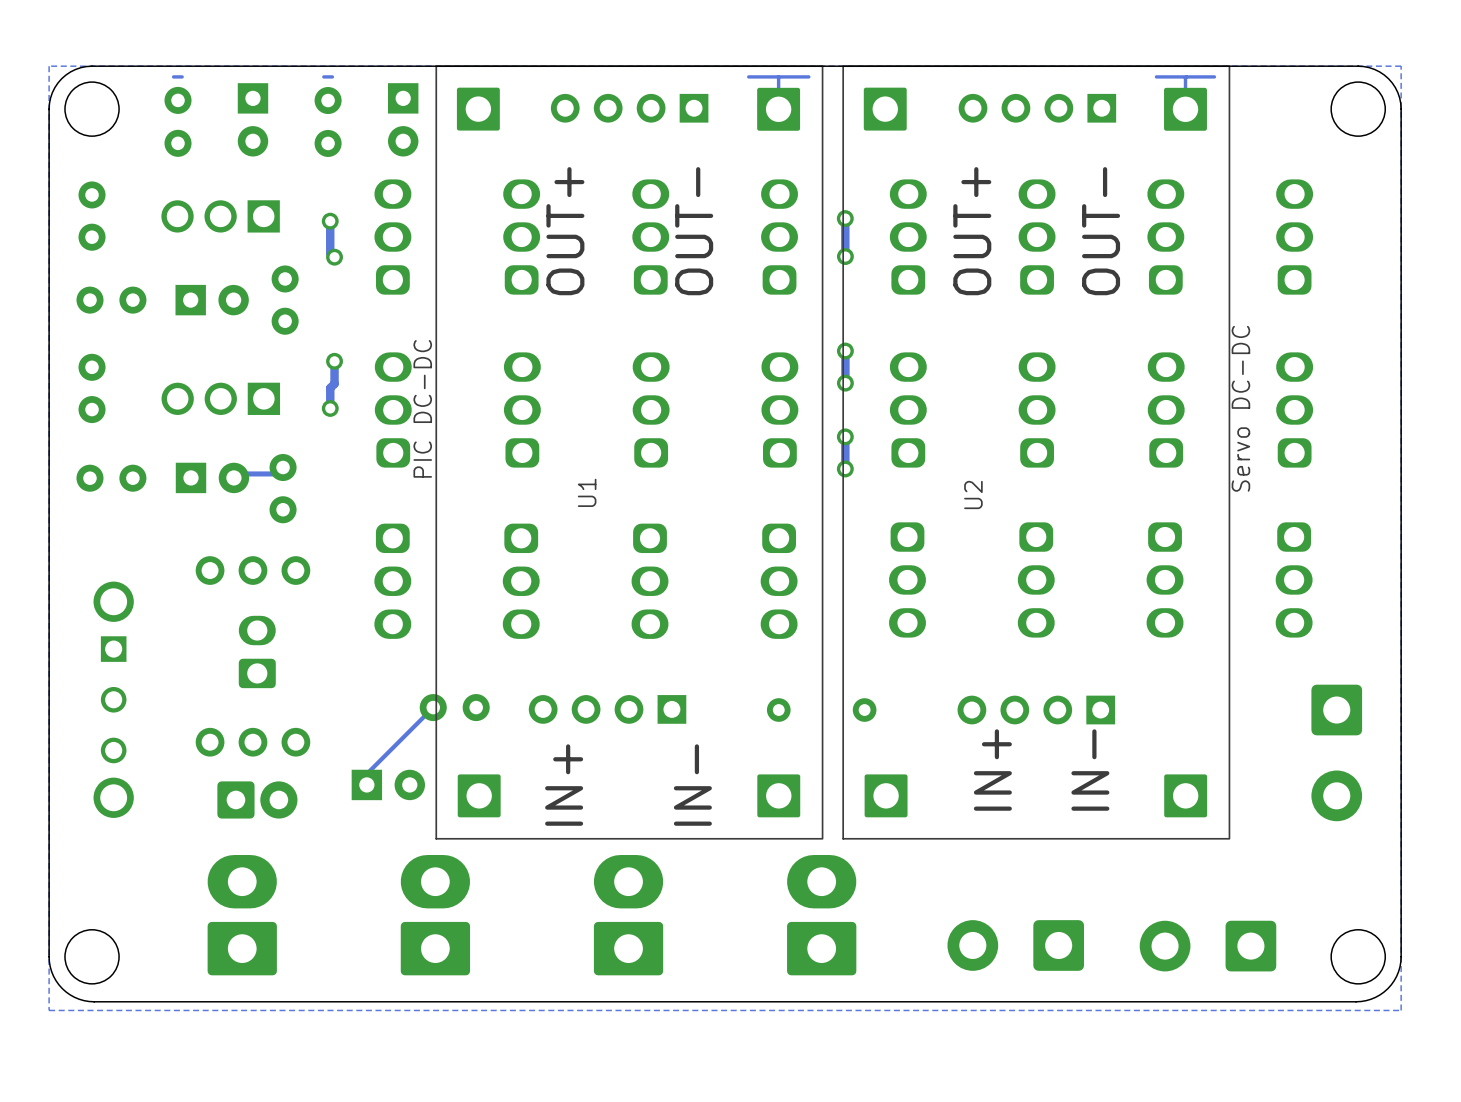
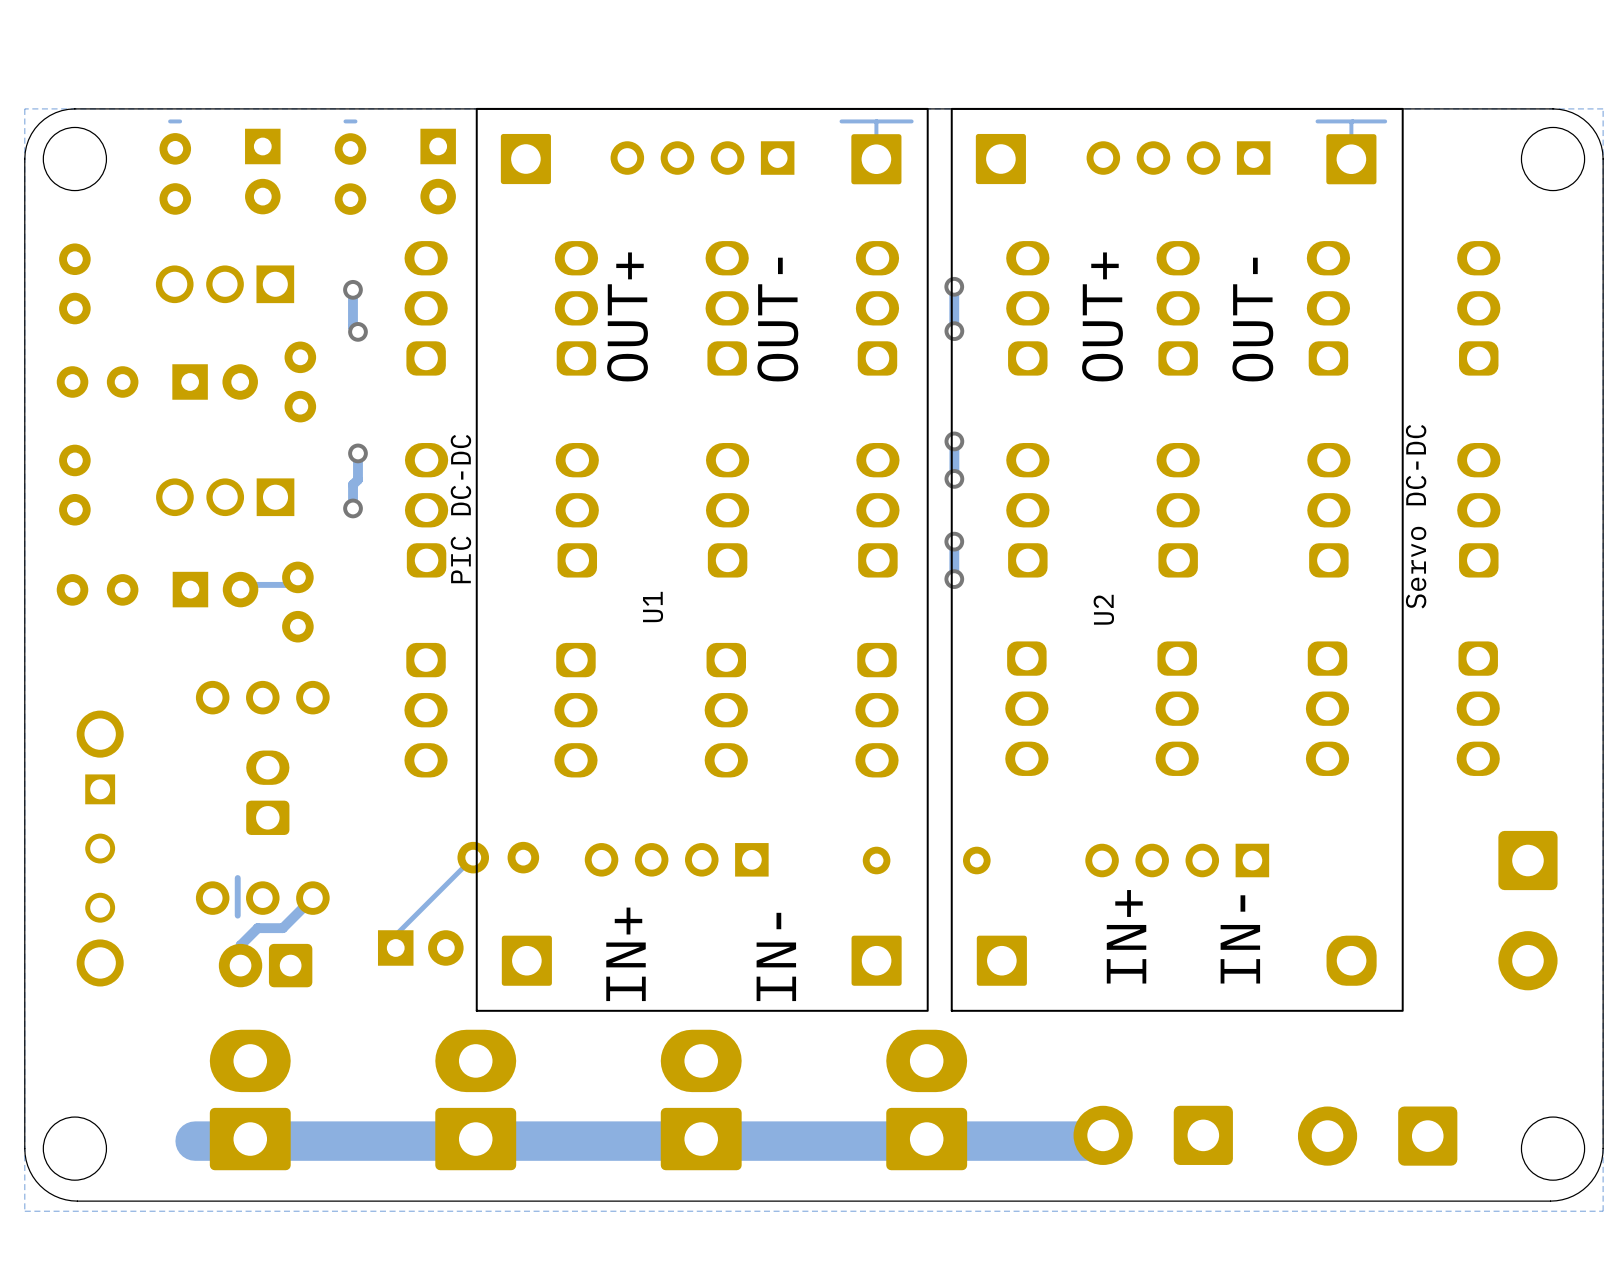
U2 footprint: [842, 65, 1231, 840] -> [950, 107, 1404, 1012]
track: none -> (237, 878) (237, 915)
track: none -> (312, 898) (282, 928) (257, 928) (240, 945) (240, 965)
part rotation: 0° (257, 799) -> 180° (265, 965)
track: none -> (1103, 1135) (1097, 1141) (195, 1141)

